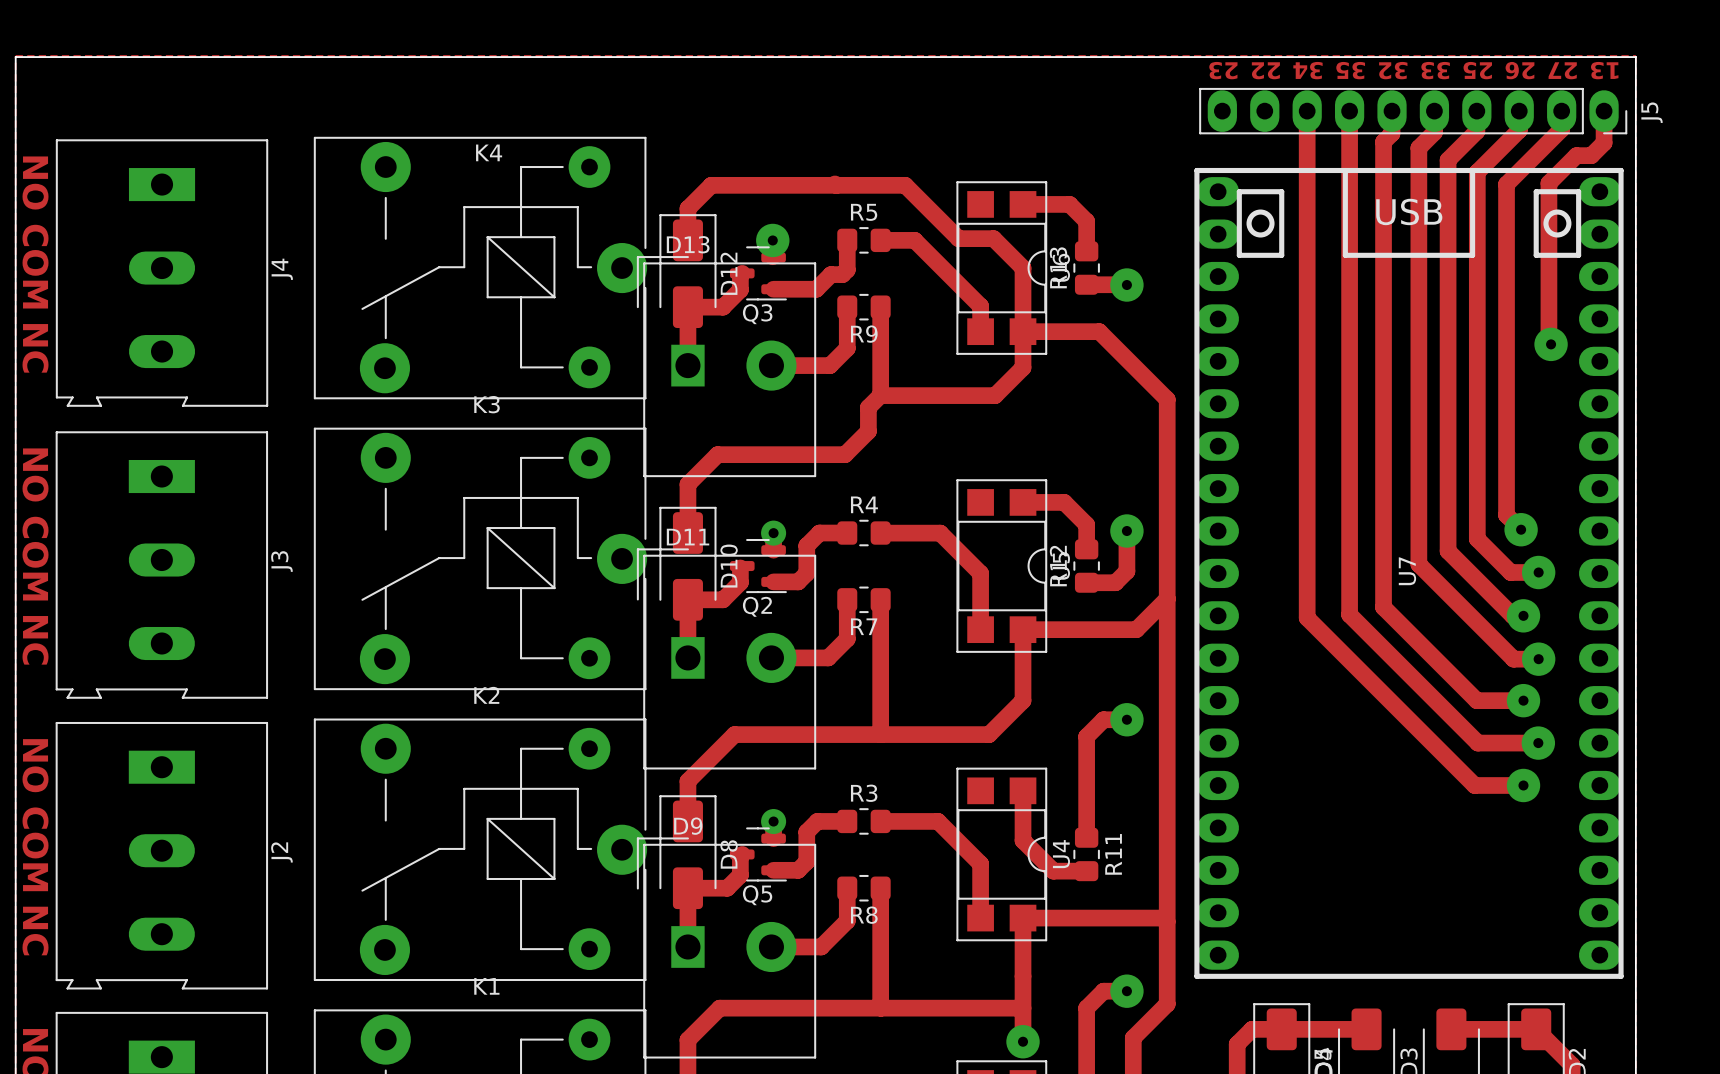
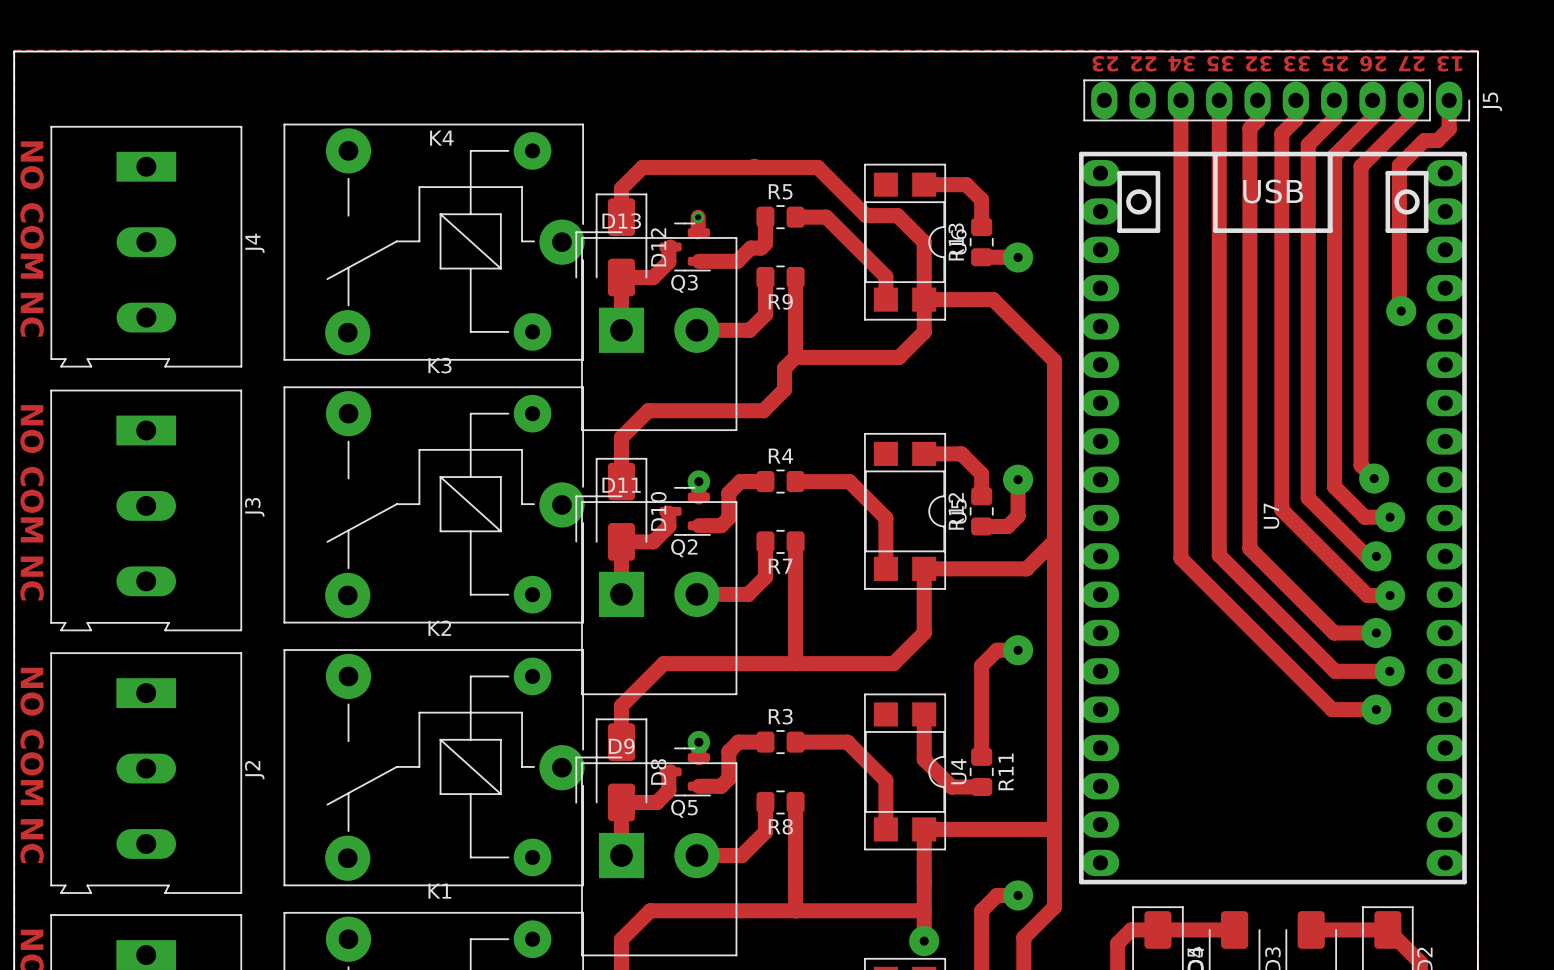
via size: [756, 223, 790, 258] -> [692, 211, 705, 224]
D13 footprint: [636, 256, 817, 478] -> [575, 231, 738, 432]
D11 footprint: [636, 548, 817, 770] -> [575, 495, 738, 696]
D9 footprint: [636, 837, 817, 1059] -> [575, 756, 738, 957]

